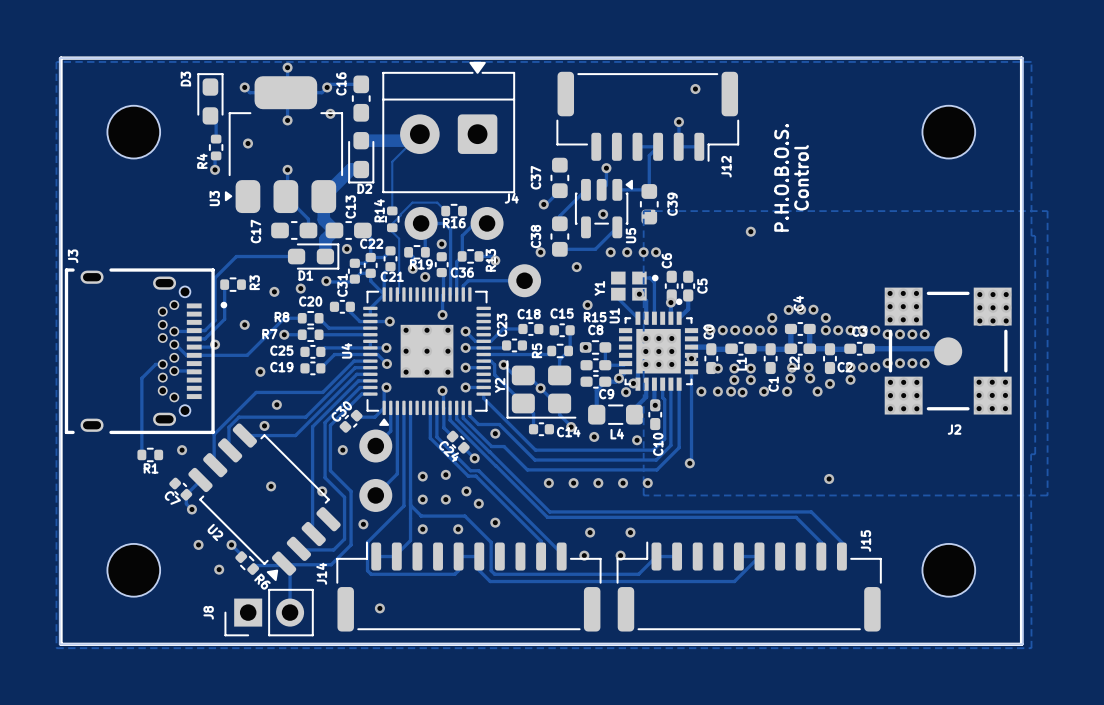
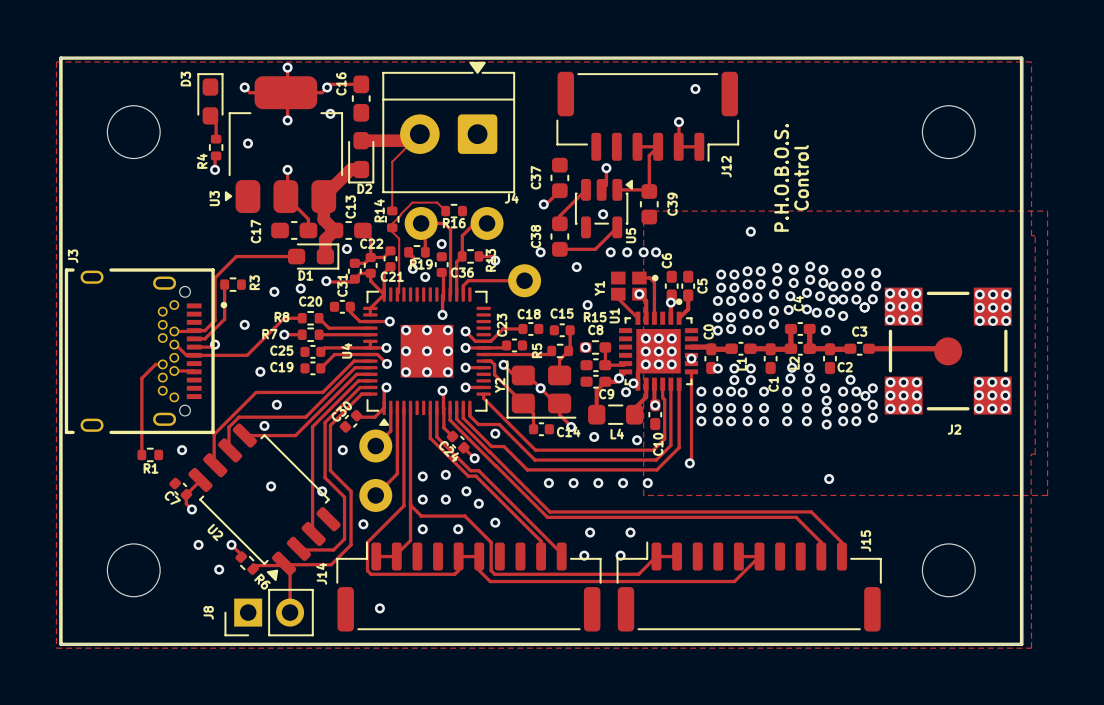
via: none -> (810, 266)
via: none -> (777, 267)
via: none -> (793, 269)
via: none -> (823, 269)
via: none -> (747, 271)
via: none -> (760, 271)
via: none -> (876, 272)
via: none -> (846, 273)
via: none -> (859, 273)
via: none -> (721, 274)
via: none -> (734, 274)
via: none -> (810, 279)
via: none -> (777, 281)
via: none -> (793, 283)
via: none -> (823, 283)
via: none -> (747, 284)
via: none -> (760, 284)
via: none -> (833, 286)
via: none -> (846, 286)
via: none -> (859, 286)
via: none -> (876, 286)
via: none -> (721, 287)
via: none -> (734, 287)
via: none -> (806, 292)
via: none -> (773, 294)
via: none -> (790, 296)
via: none -> (820, 296)
via: none -> (744, 297)
via: none -> (757, 297)
via: none -> (833, 299)
via: none -> (843, 299)
via: none -> (856, 299)
via: none -> (872, 299)
via: none -> (717, 300)
via: none -> (731, 300)
via: none -> (864, 307)
via: (801, 309) -> none
via: none -> (806, 309)
via: (813, 309) -> none
via: none -> (773, 310)
via: none -> (816, 312)
via: none -> (829, 312)
via: none -> (744, 314)
via: none -> (757, 314)
via: none -> (843, 316)
via: none -> (717, 317)
via: none -> (731, 317)
via: (772, 317) -> none
via: (825, 317) -> none
via: none -> (773, 324)
via: none -> (731, 329)
via: (710, 330) -> none
via: none -> (717, 330)
via: (722, 330) -> none
via: (735, 330) -> none
via: (772, 330) -> none
via: (838, 330) -> none
via: (850, 330) -> none
via: (862, 330) -> none
via: (875, 330) -> none
via: (887, 334) -> none
via: (900, 334) -> none
via: (912, 334) -> none
via: (924, 334) -> none
via: (887, 363) -> none
via: (900, 363) -> none
via: (912, 363) -> none
via: (924, 363) -> none
via: (850, 367) -> none
via: (862, 367) -> none
via: (875, 367) -> none
via: (829, 383) -> none
via: none -> (825, 388)
via: none -> (872, 388)
via: none -> (806, 391)
via: (817, 391) -> none
via: none -> (843, 391)
via: none -> (856, 391)
via: none -> (865, 395)
via: none -> (826, 400)
via: none -> (872, 404)
via: none -> (701, 408)
via: none -> (717, 408)
via: none -> (731, 408)
via: none -> (747, 408)
via: none -> (764, 408)
via: none -> (787, 408)
via: none -> (806, 408)
via: none -> (843, 408)
via: none -> (856, 408)
via: none -> (826, 411)
via: none -> (872, 417)
via: none -> (701, 421)
via: none -> (717, 421)
via: none -> (731, 421)
via: none -> (747, 421)
via: none -> (764, 421)
via: none -> (787, 421)
via: none -> (806, 421)
via: none -> (843, 421)
via: none -> (856, 421)
via: none -> (826, 424)

